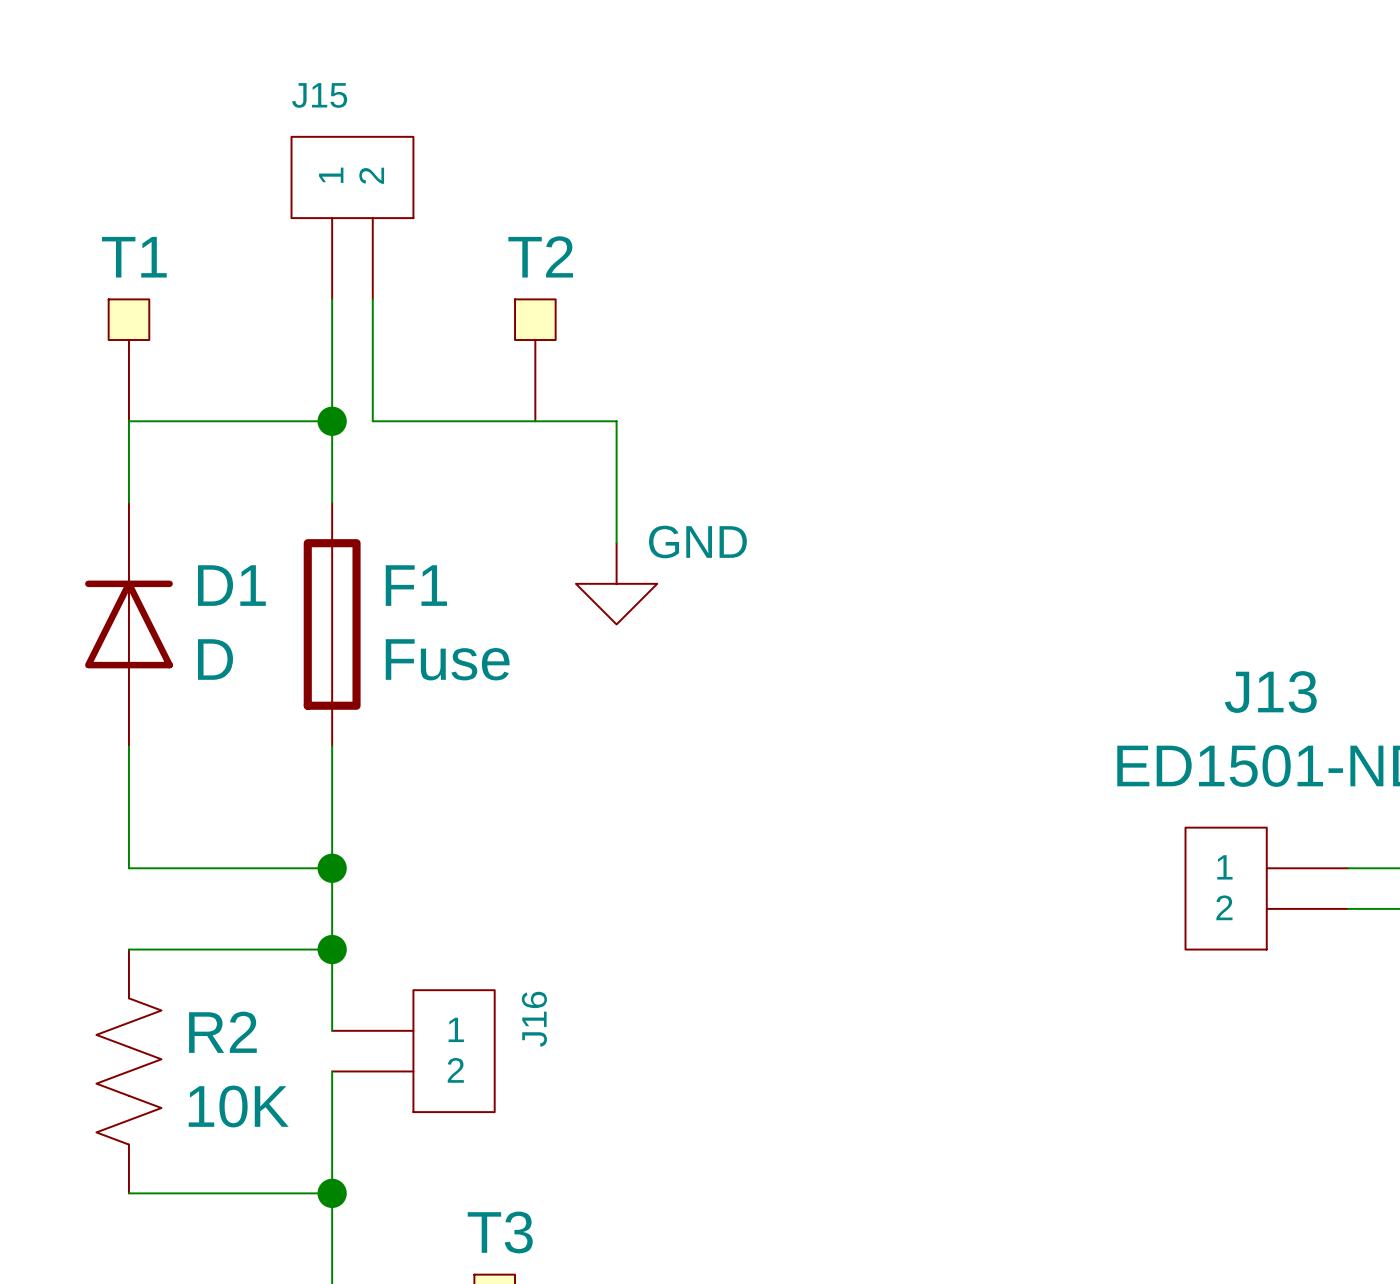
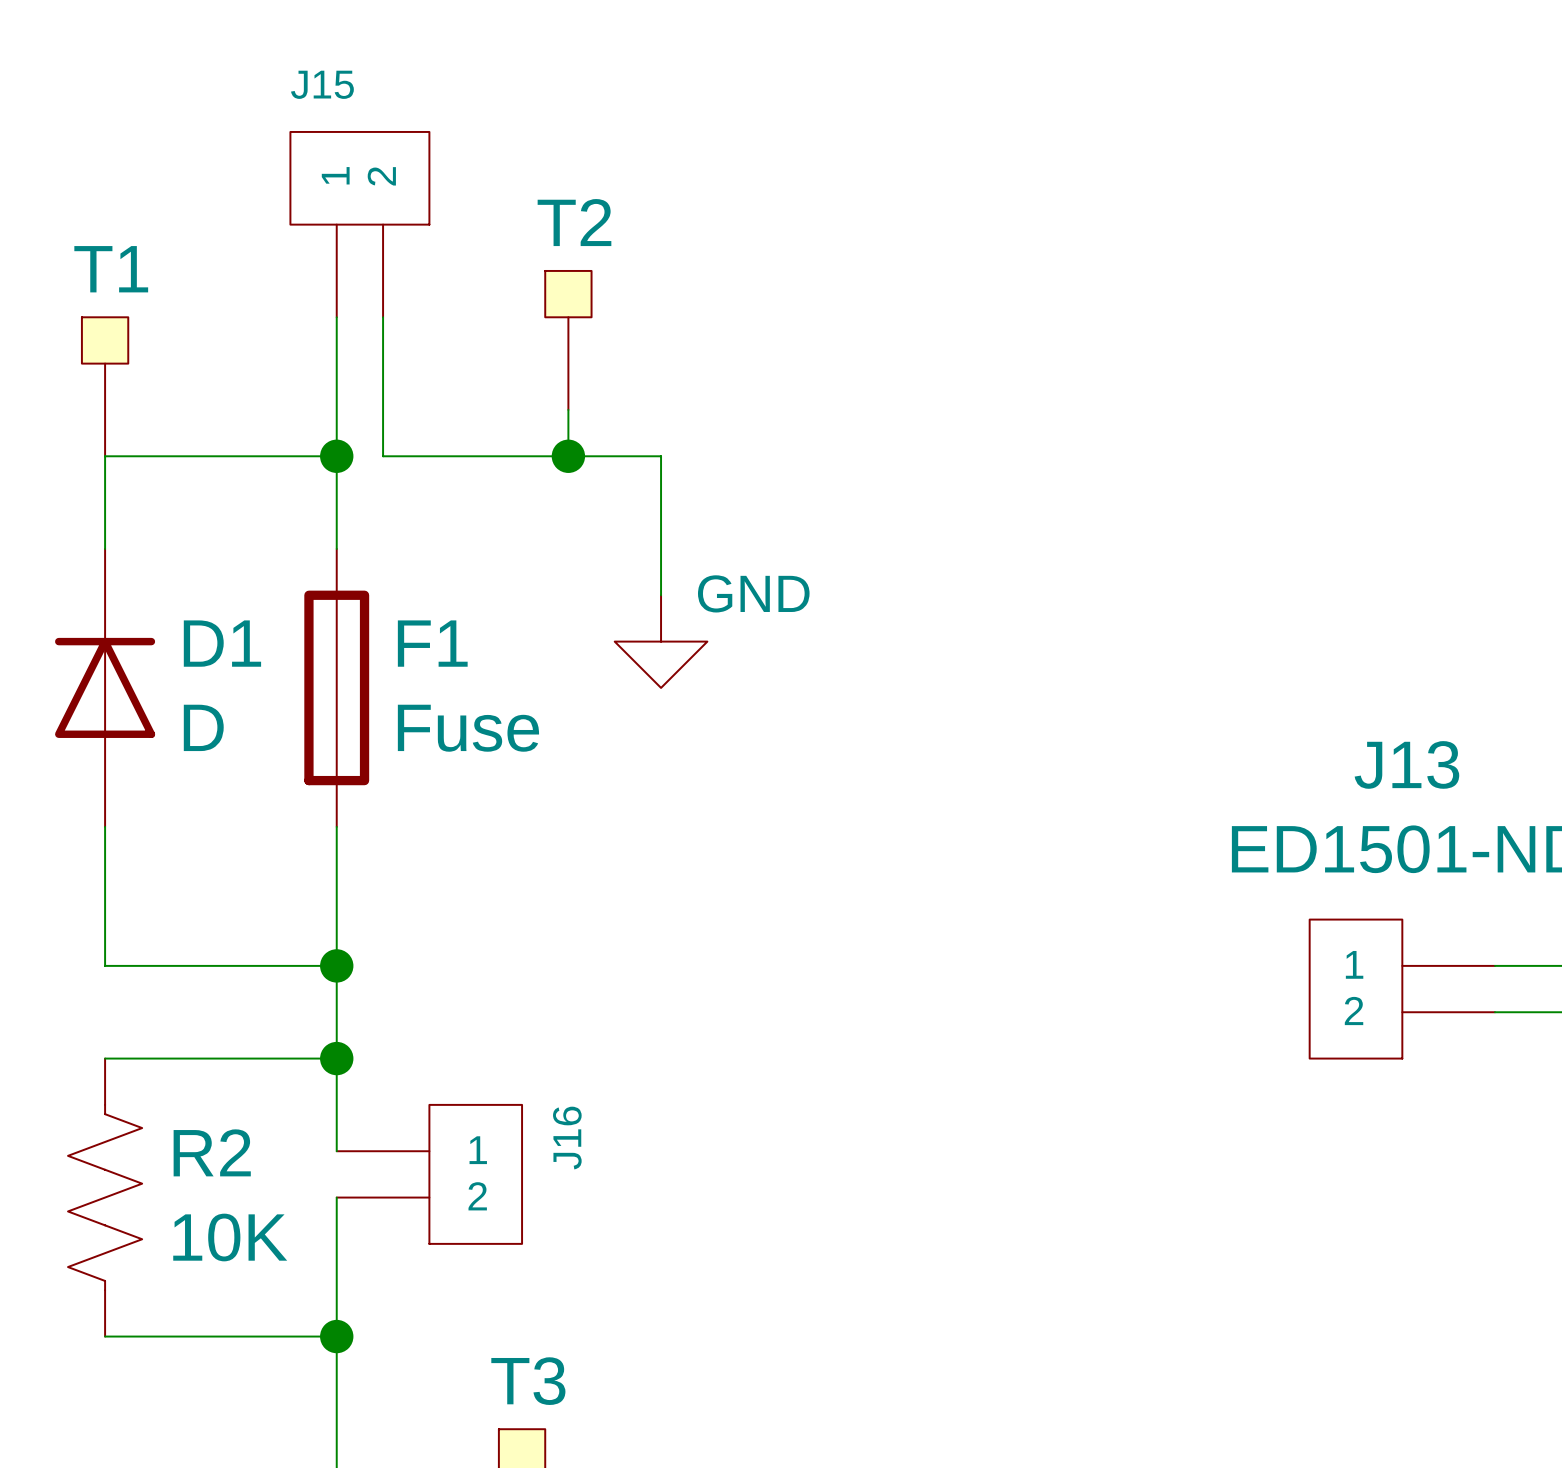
T2 position: (535, 360) -> (568, 340)
junction: none -> (568, 456)

